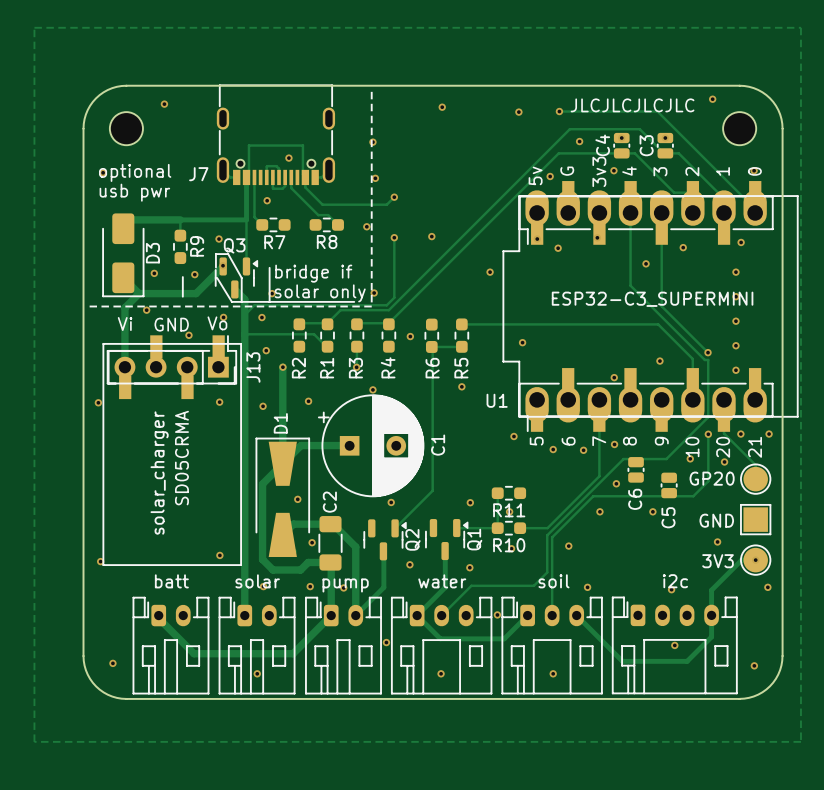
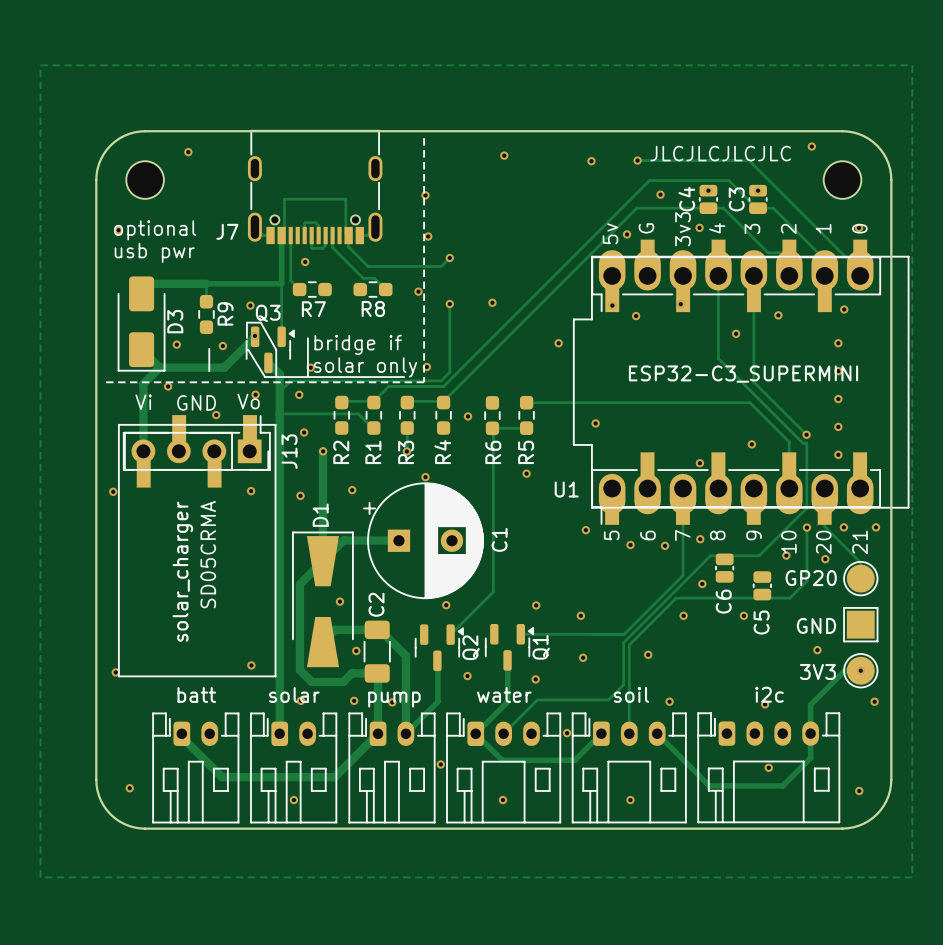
via: (288, 158) -> none
track: (497, 493) (497, 528) (456, 528) -> (624, 634) (520, 634)
R11: (508, 493) -> none
R10: (508, 528) -> none

